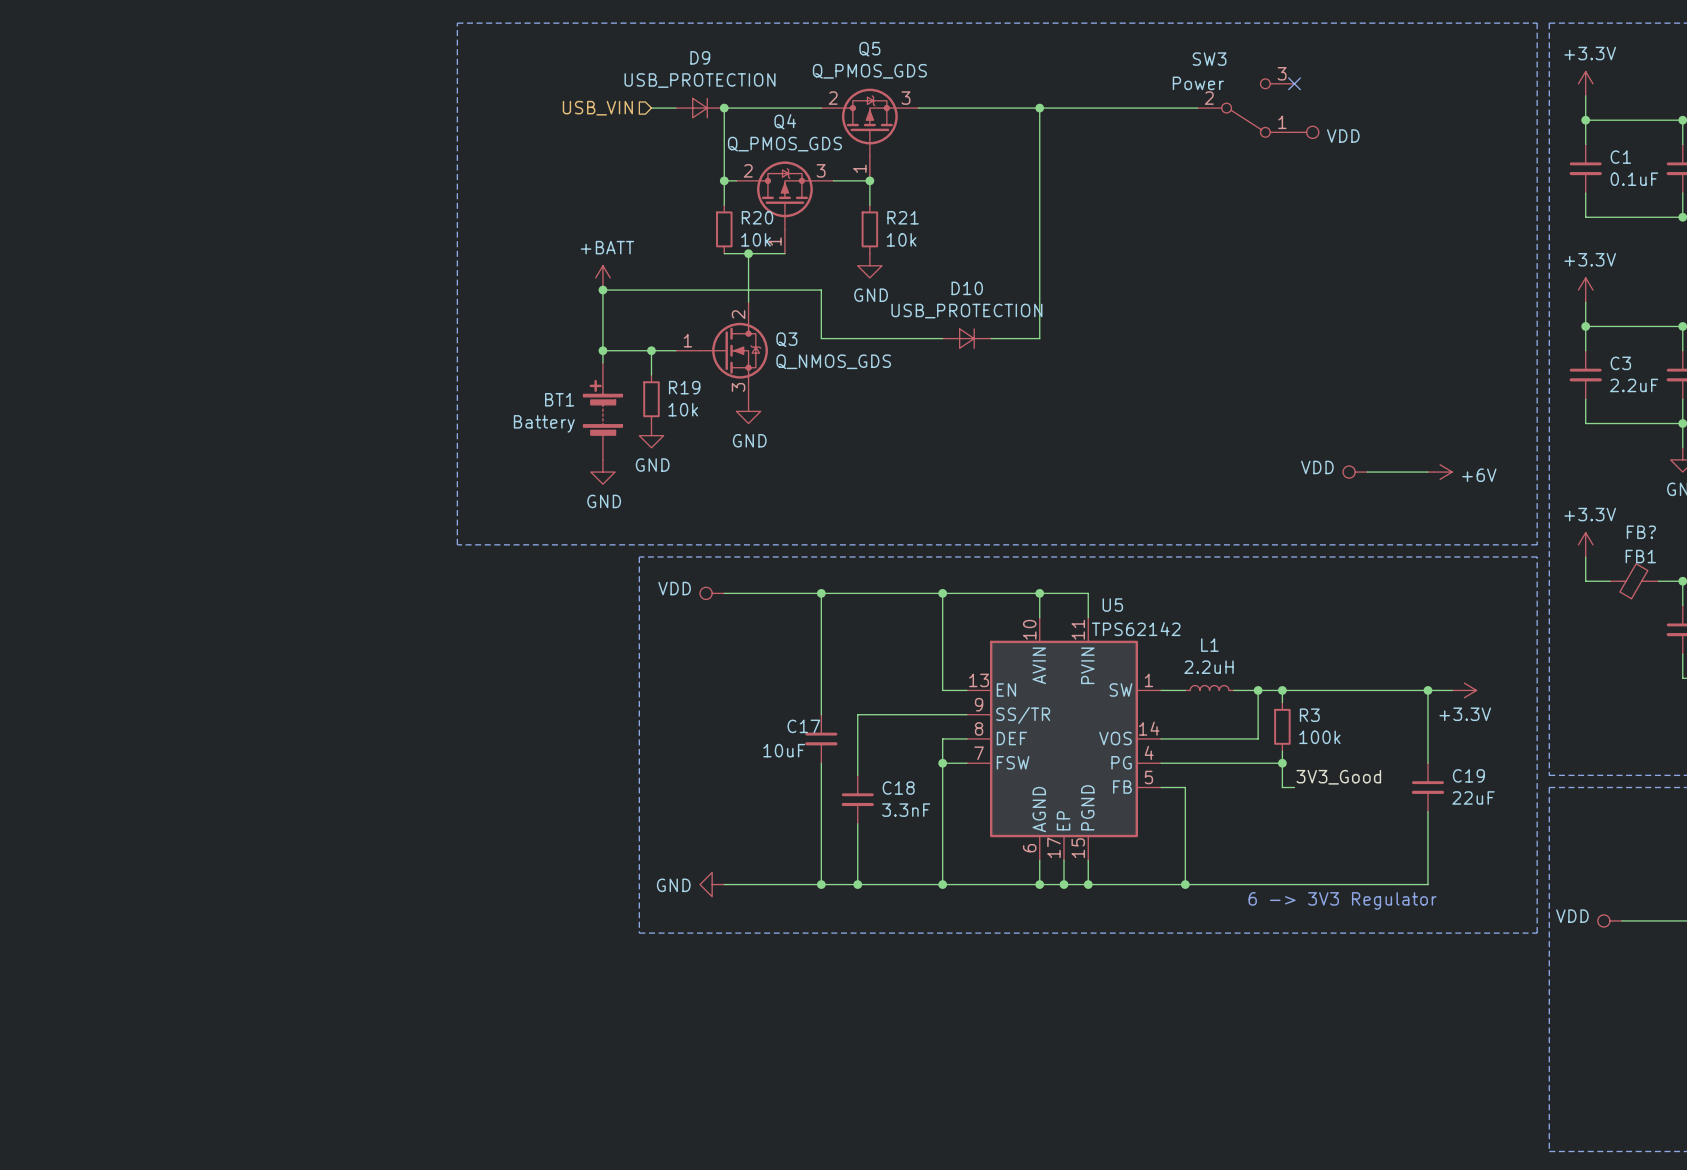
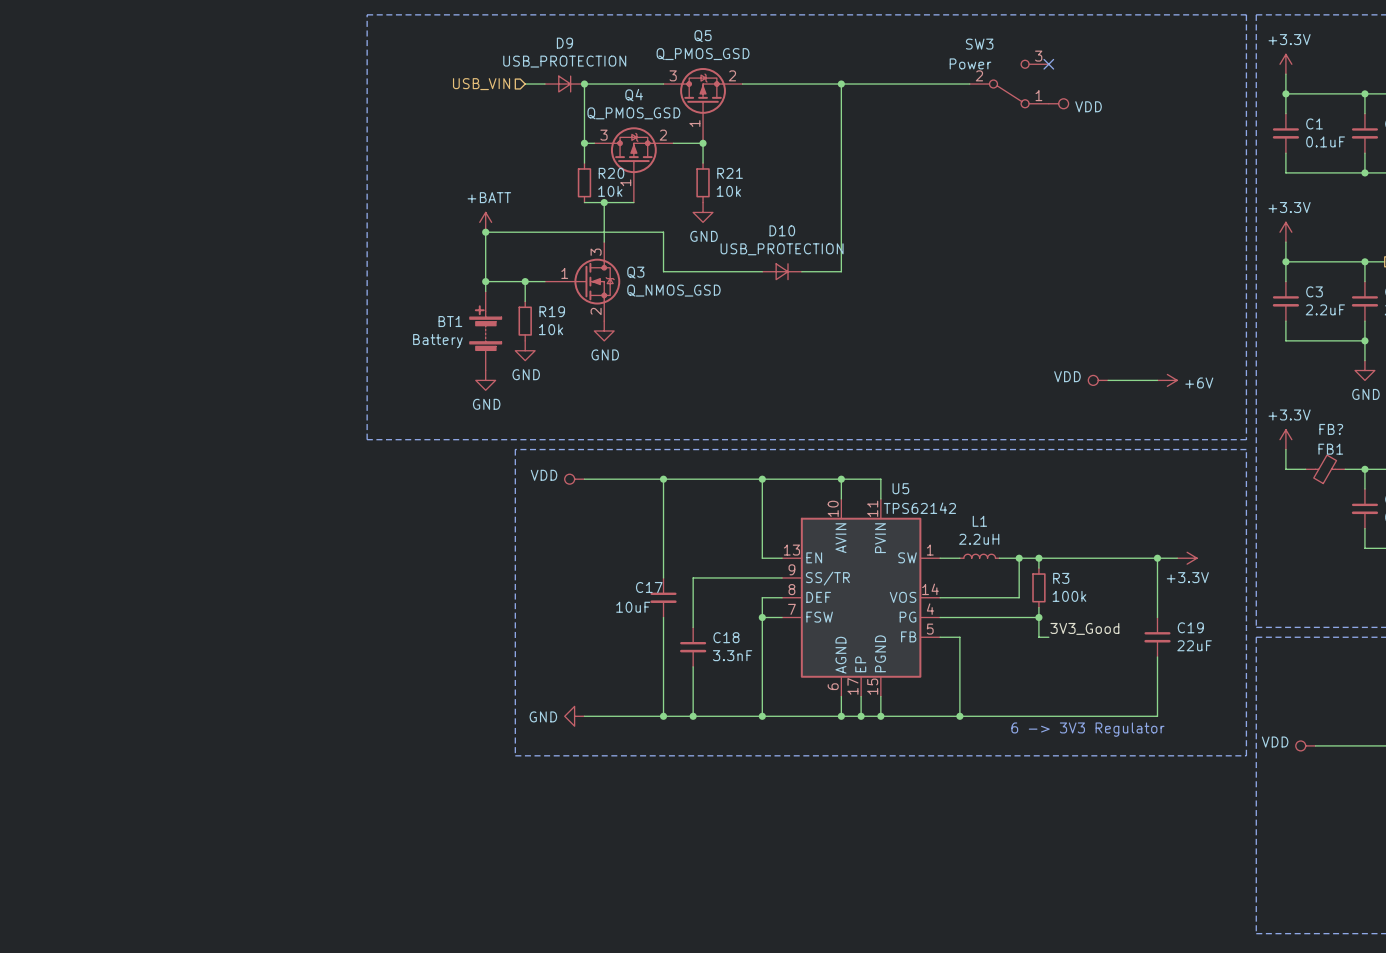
Q5 value: Q_PMOS_GDS (869, 71) -> Q_PMOS_GSD (703, 54)
Q5 symbol: [821, 88, 919, 181] -> [663, 68, 743, 144]
Q4 value: Q_PMOS_GDS (784, 144) -> Q_PMOS_GSD (633, 113)
Q4 symbol: [736, 161, 834, 254] -> [594, 127, 674, 203]
Q3 symbol: [675, 302, 768, 400] -> [544, 242, 621, 322]
Q3 value: Q_NMOS_GDS (833, 361) -> Q_NMOS_GSD (673, 290)

